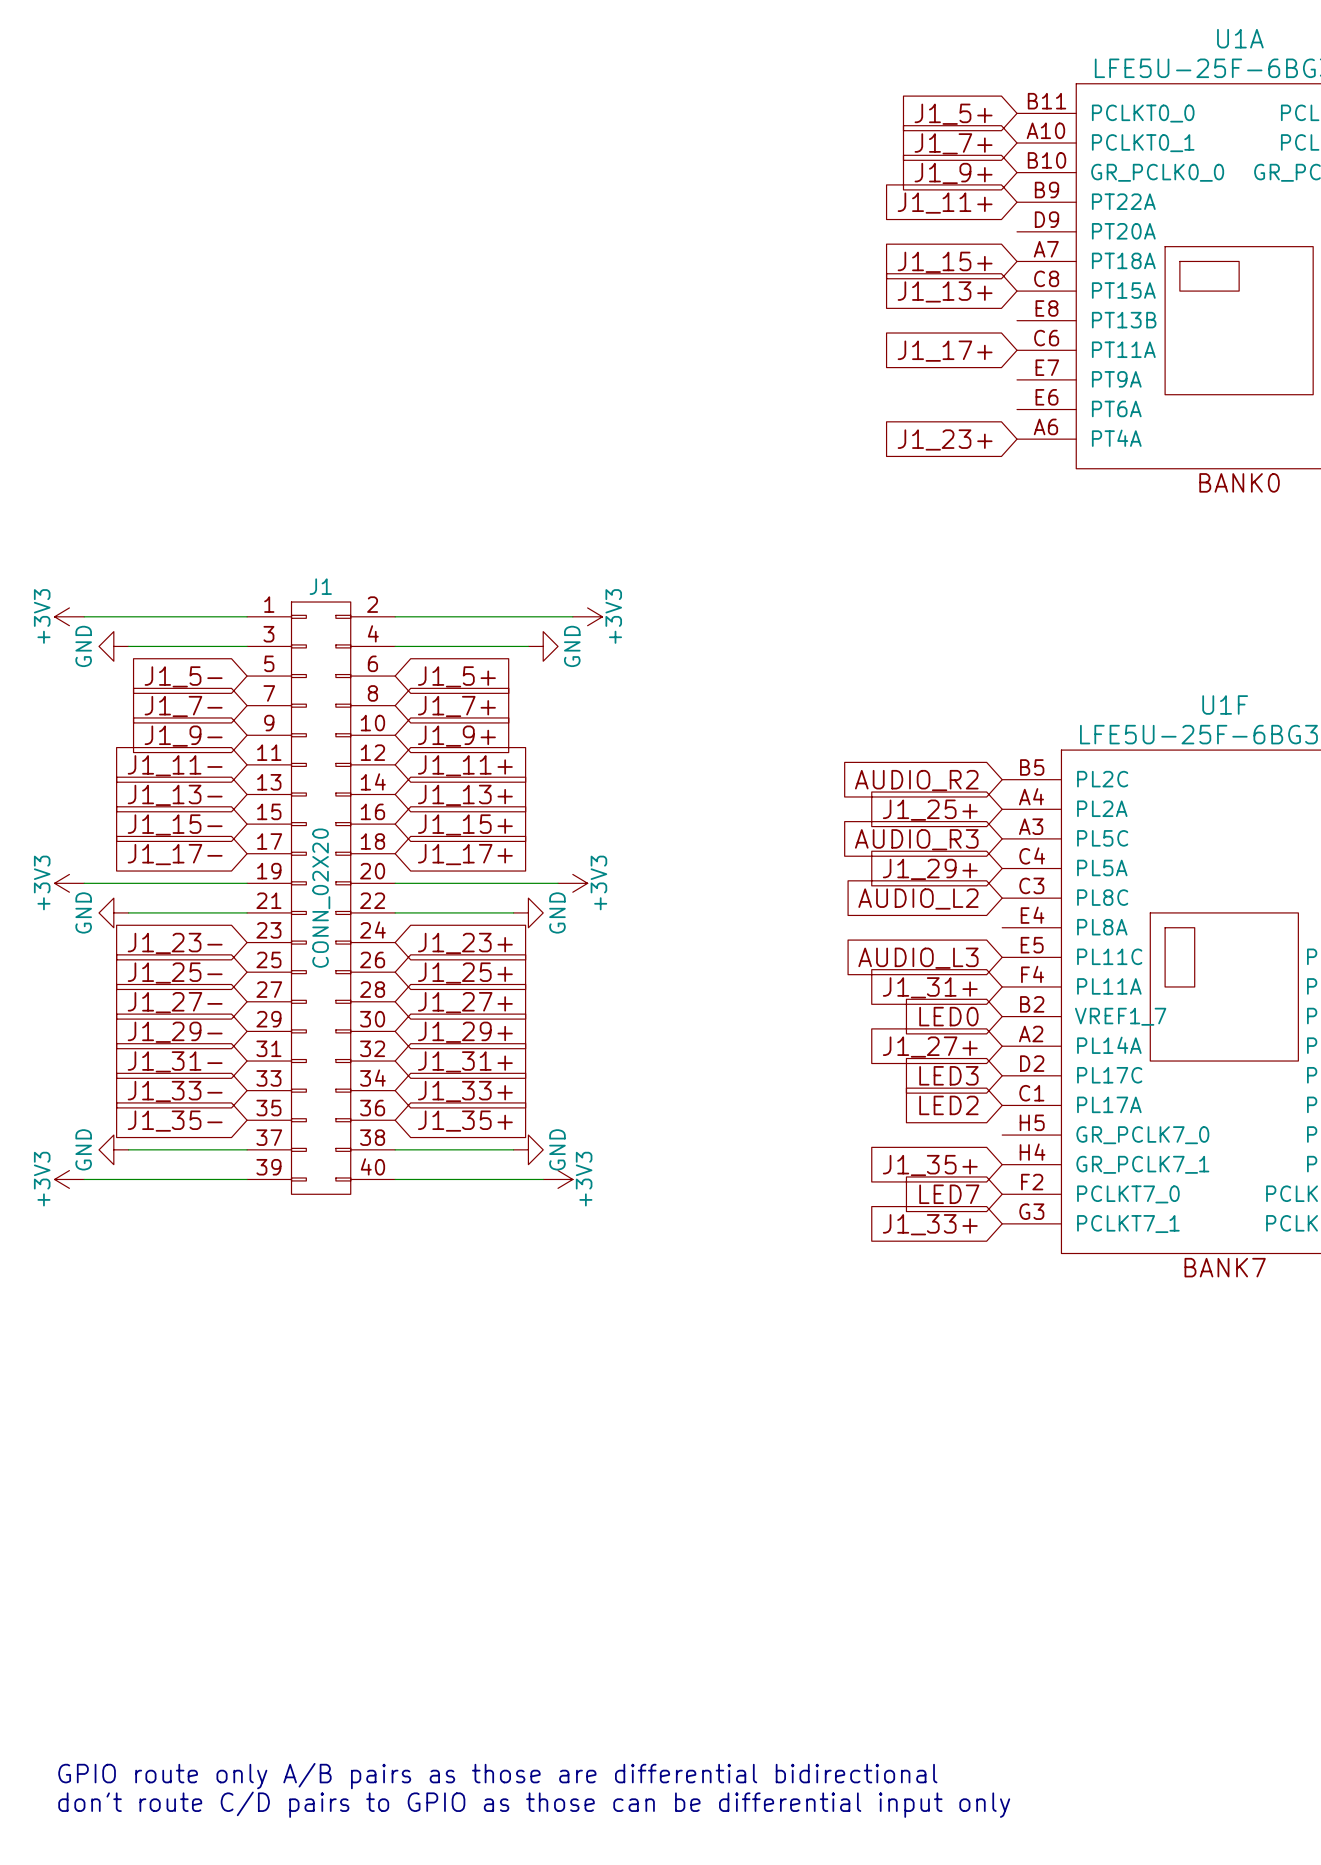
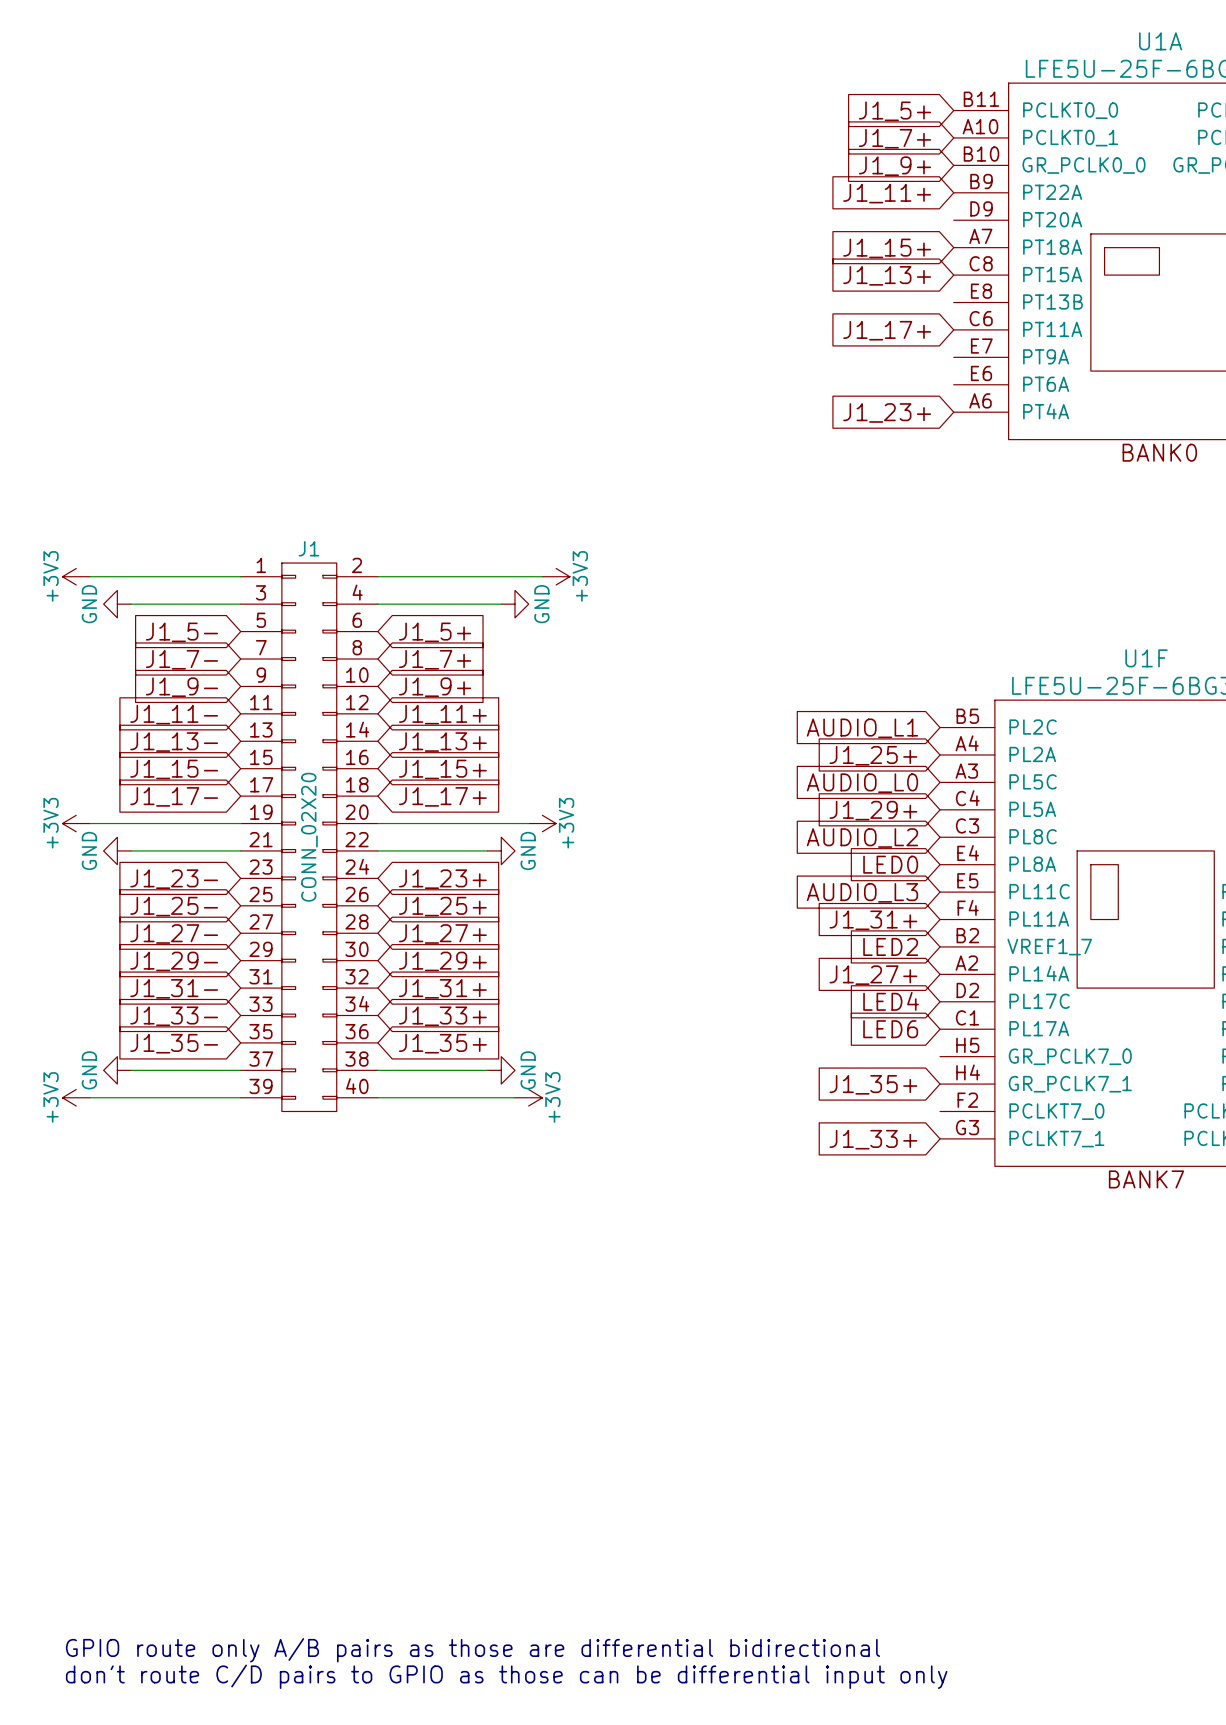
global label: AUDIO_R2 (916, 780) -> AUDIO_L1 (862, 728)
global label: AUDIO_R3 (916, 839) -> AUDIO_L0 (862, 783)
global label: none -> LED0 (890, 864)
global label: LED0 (948, 1016) -> LED2 (890, 946)
global label: LED3 (948, 1075) -> LED4 (891, 1001)
global label: LED2 (948, 1105) -> LED6 (890, 1029)
global label: LED7 (949, 1194) -> none

